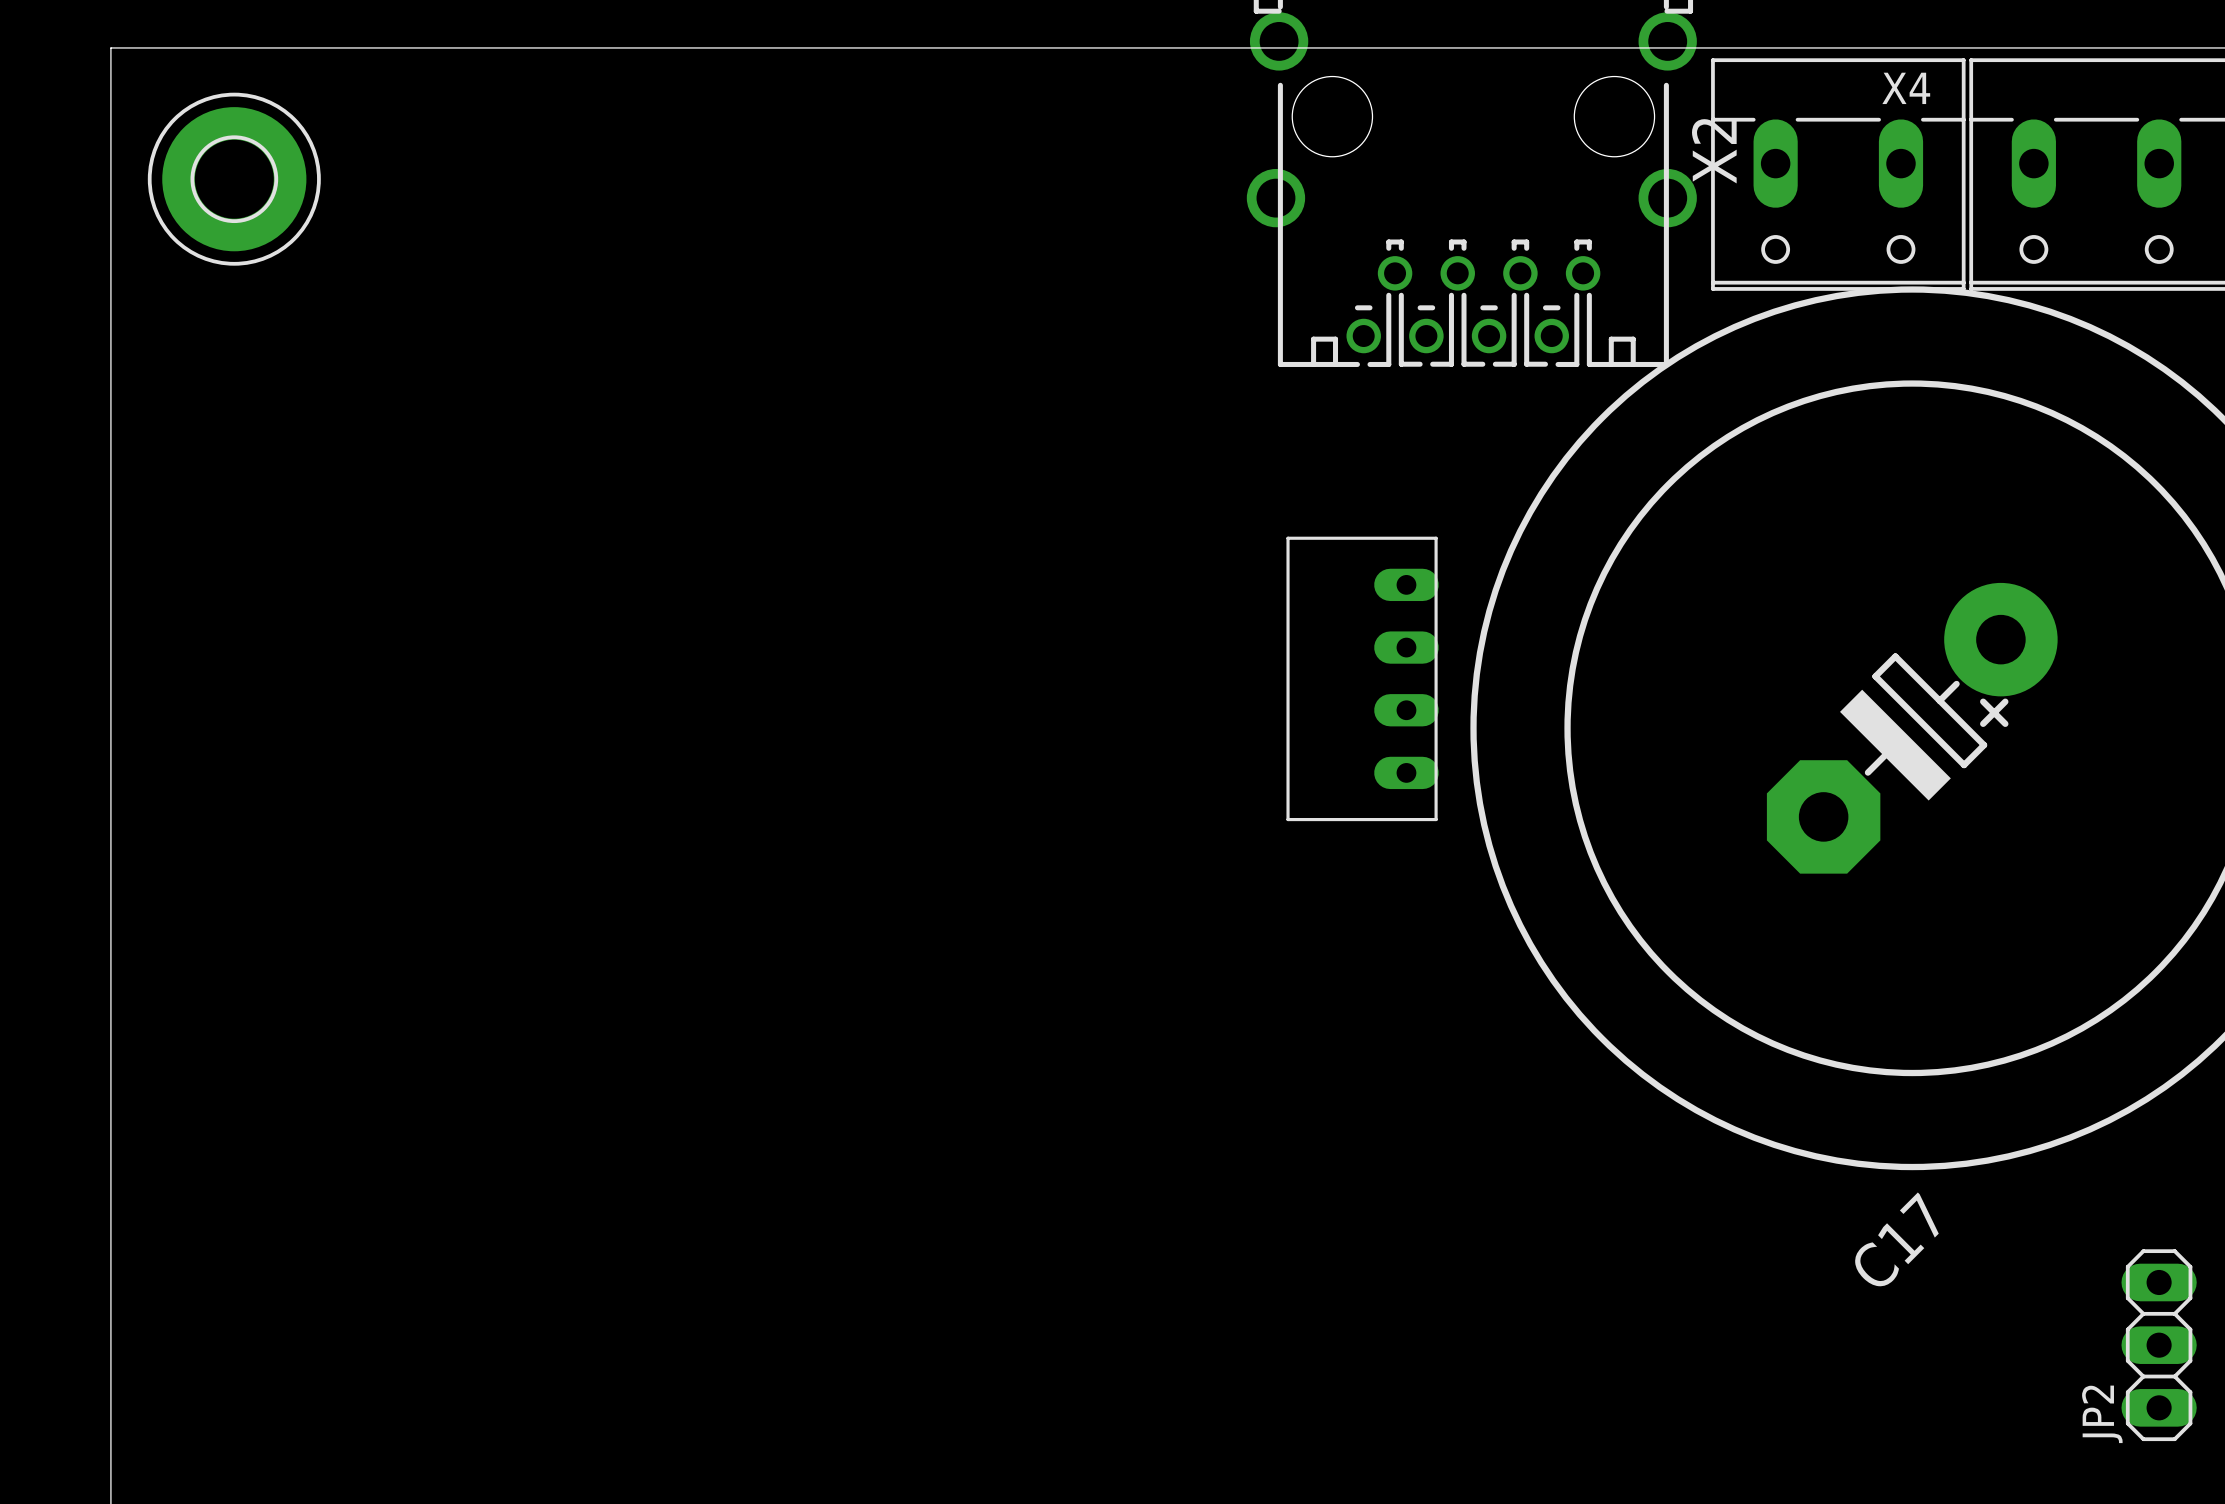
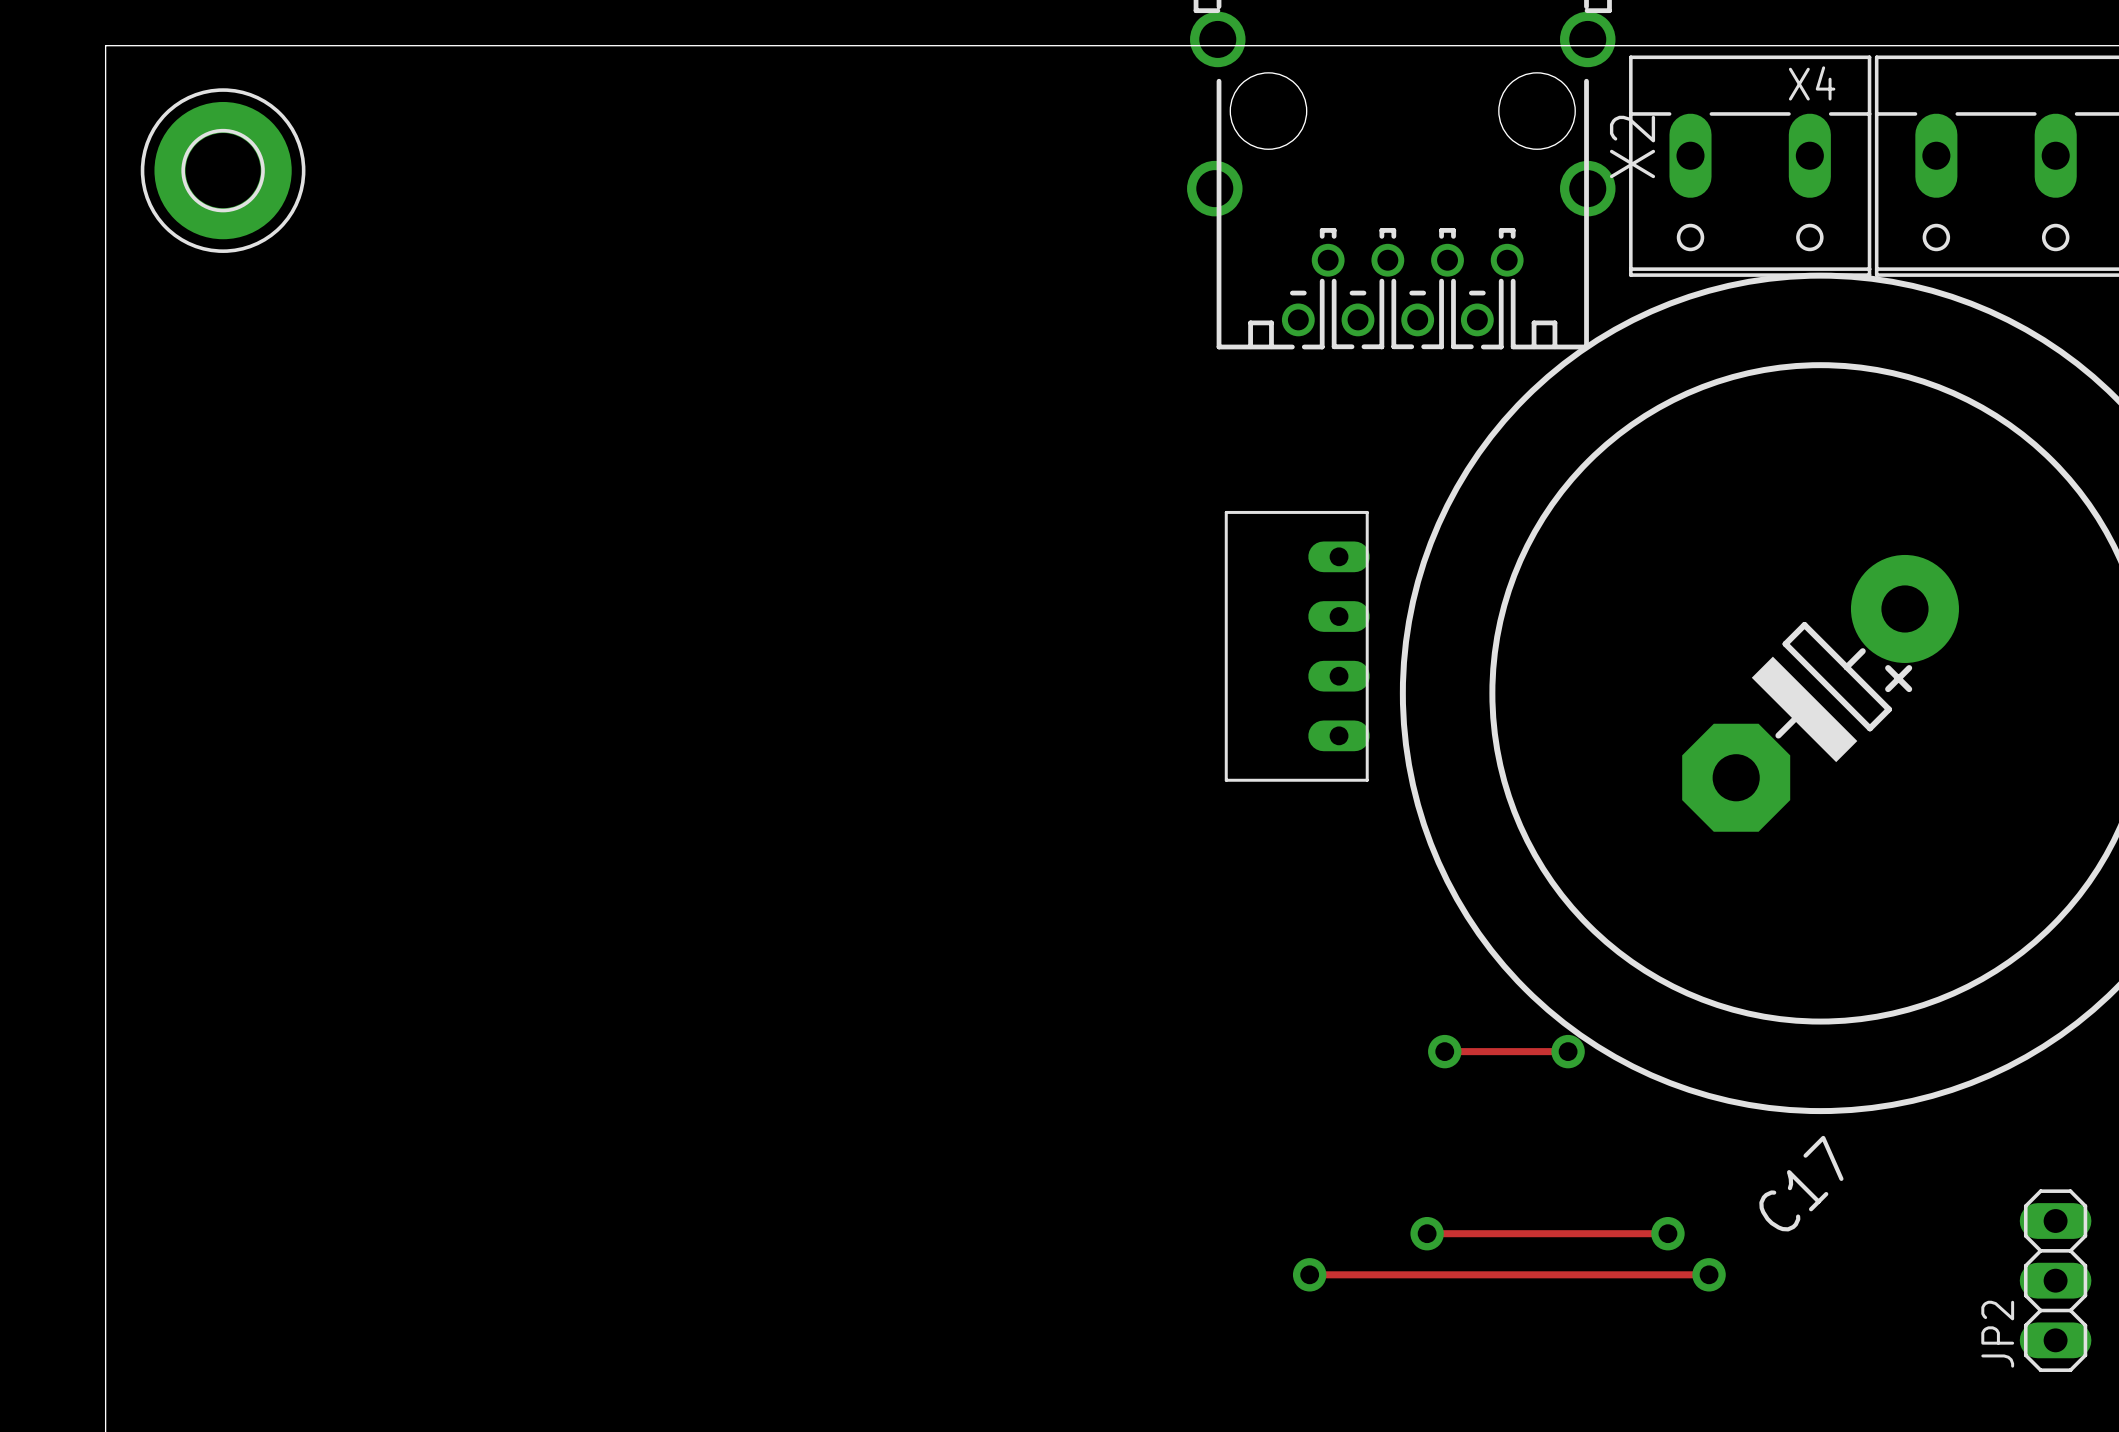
track: none -> (1444, 1051) (1568, 1051)
via: none -> (1444, 1051)
via: none -> (1568, 1051)
track: none -> (1427, 1233) (1667, 1233)
via: none -> (1427, 1233)
via: none -> (1667, 1233)
track: none -> (1309, 1274) (1709, 1274)
via: none -> (1309, 1274)
via: none -> (1709, 1274)

